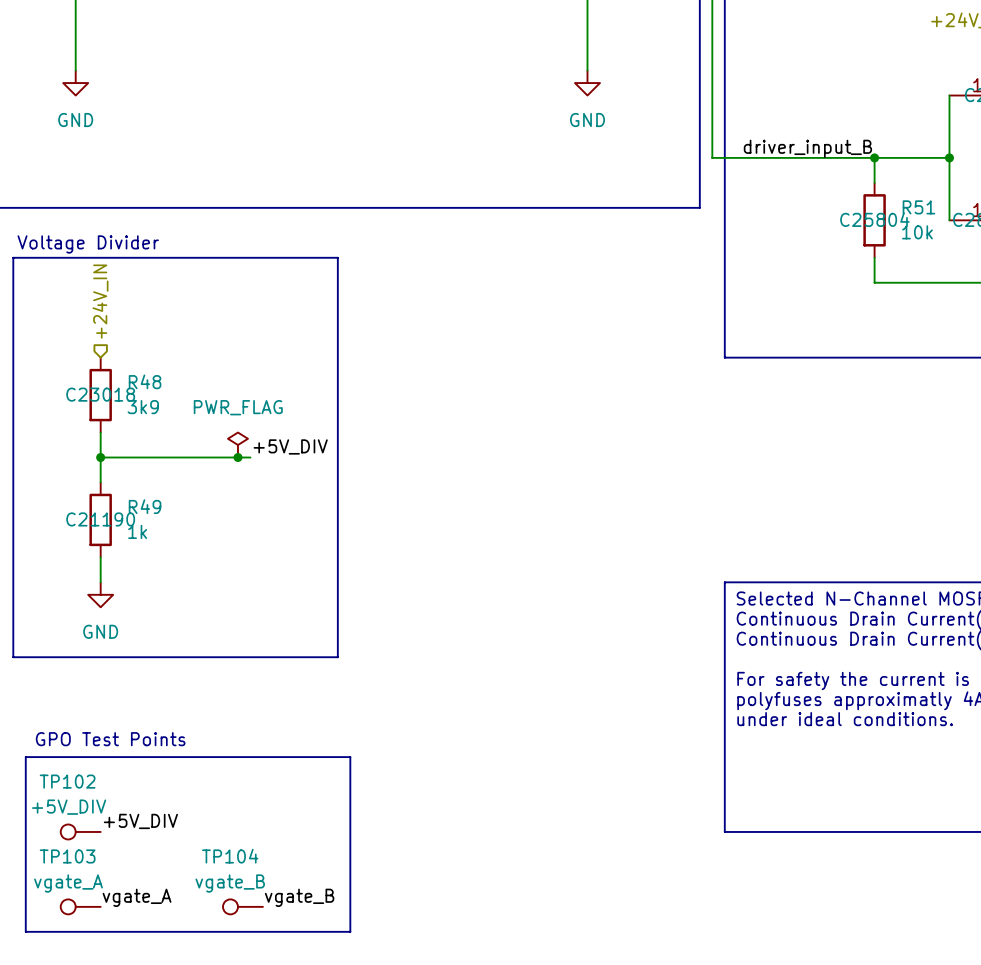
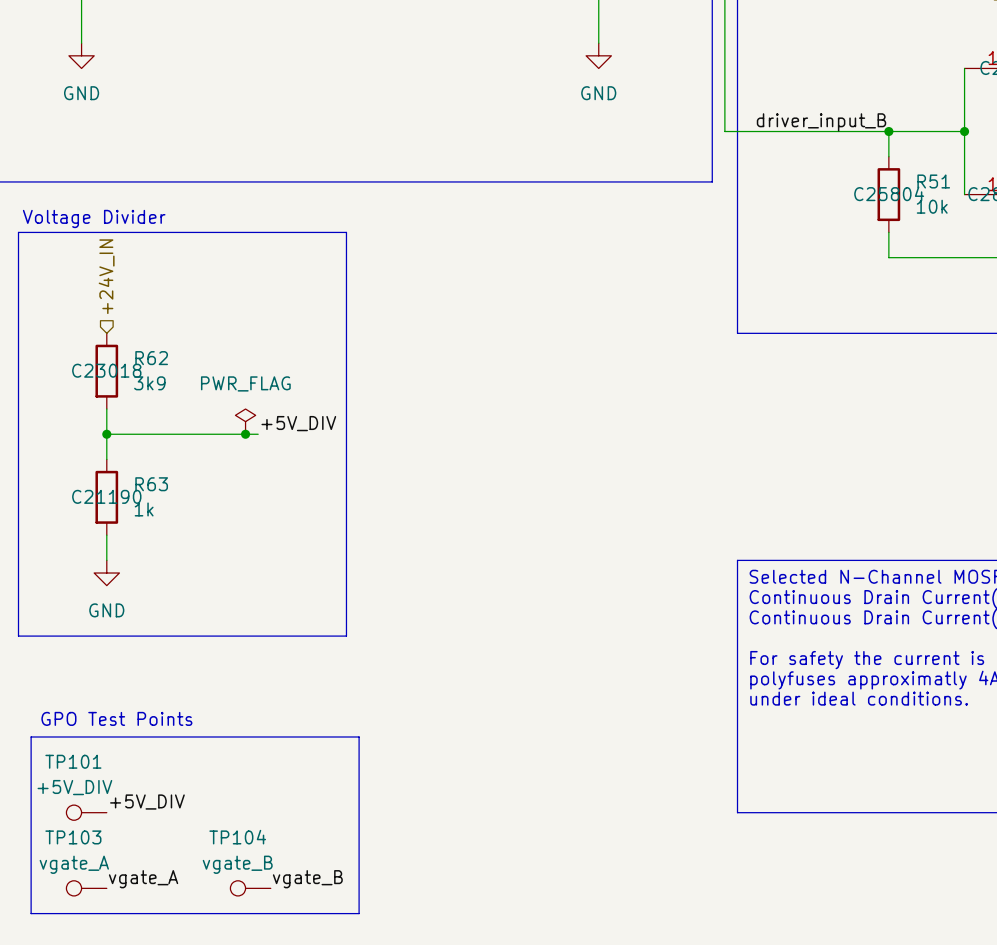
R48 name: R48 (145, 381) -> R62 (151, 358)
R49 name: R49 (145, 506) -> R63 (151, 484)
TP102 name: TP102 (67, 781) -> TP101 (73, 761)

